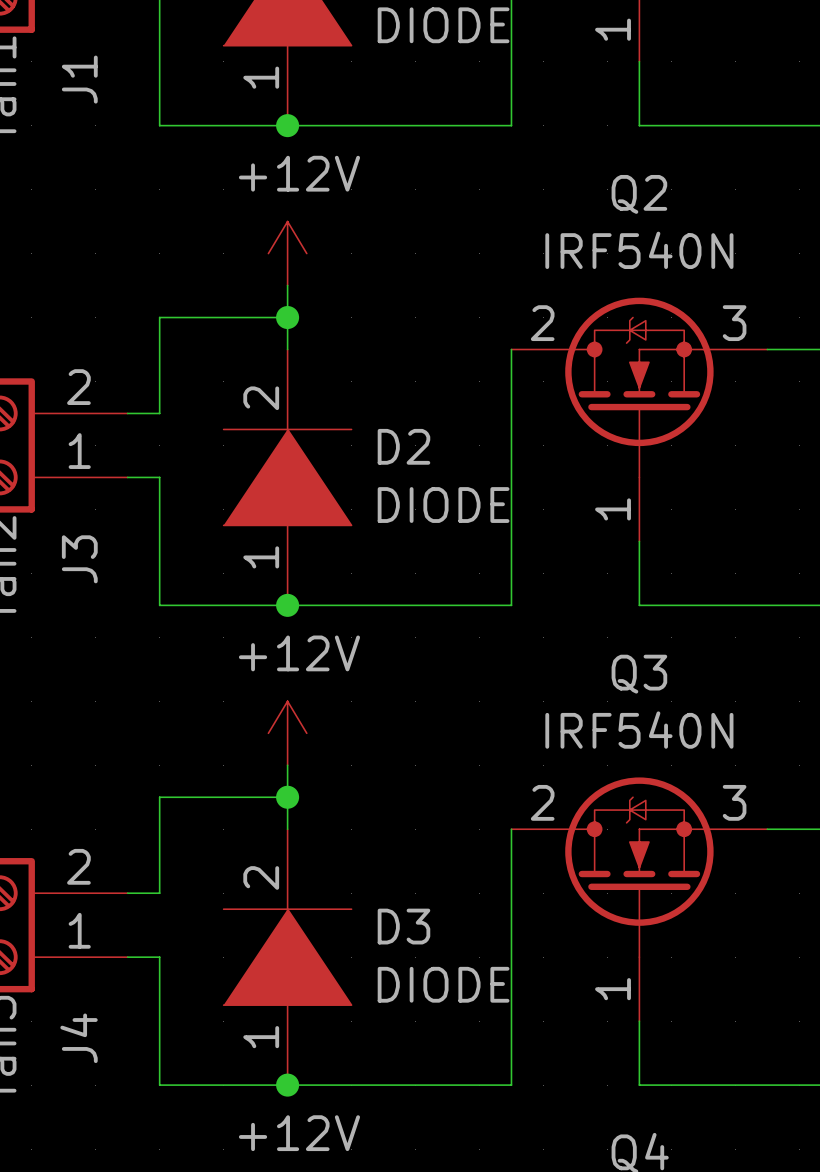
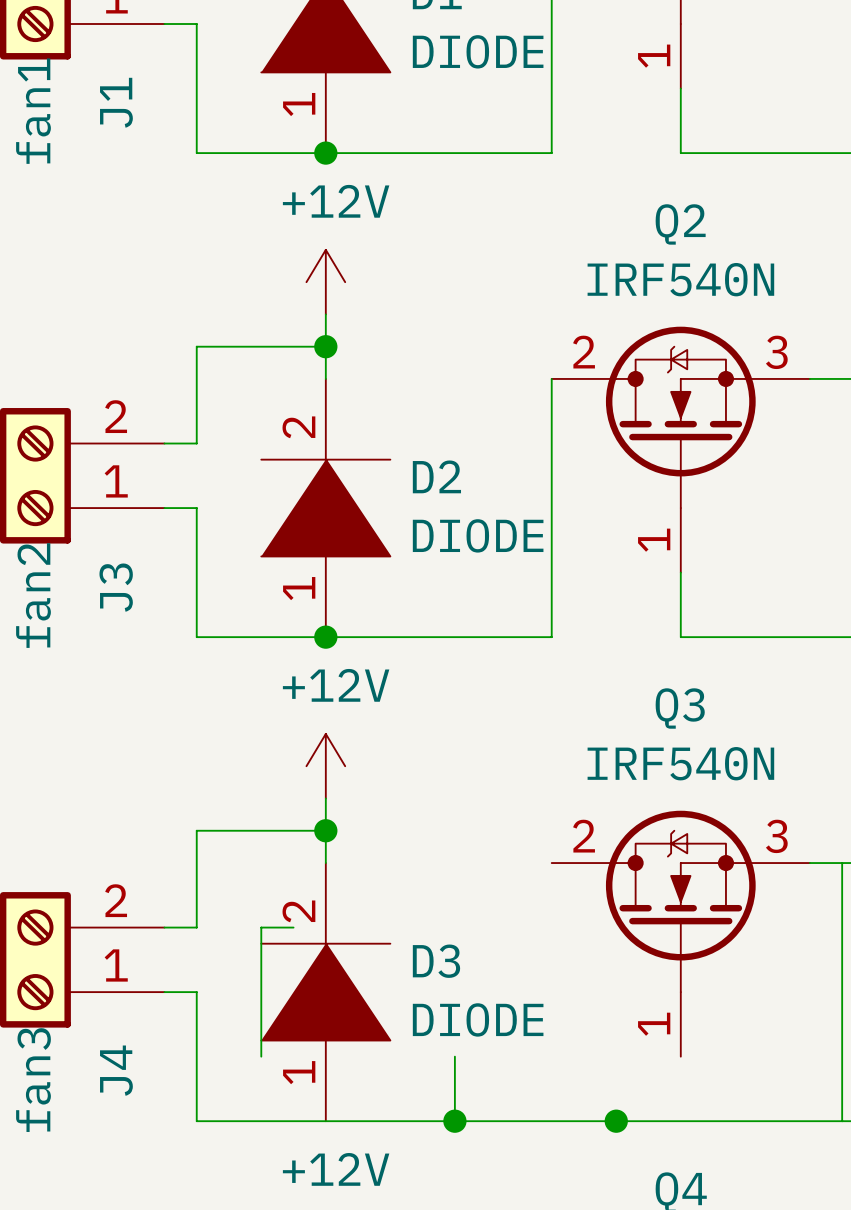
wire: (511, 829) (511, 1085) -> (842, 863) (842, 1121)
wire: none -> (293, 927) (261, 927) (261, 1056)
wire: none -> (454, 1056) (454, 1121)
wire: (639, 1021) (639, 1085) -> (551, 1121) (680, 1121)
junction: (287, 1085) -> none
junction: none -> (454, 1121)
junction: none -> (616, 1121)

